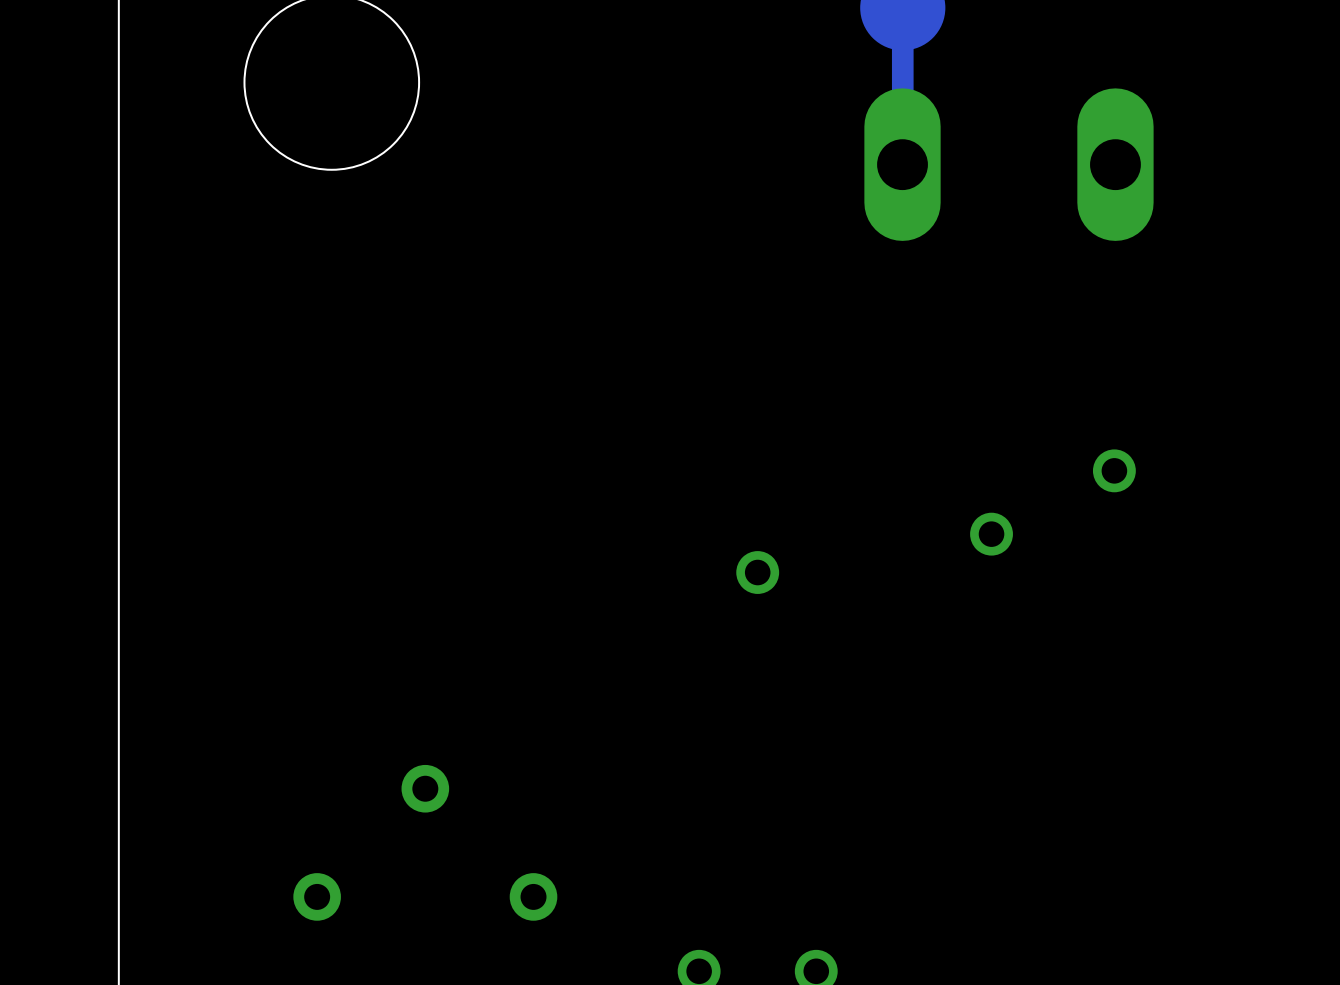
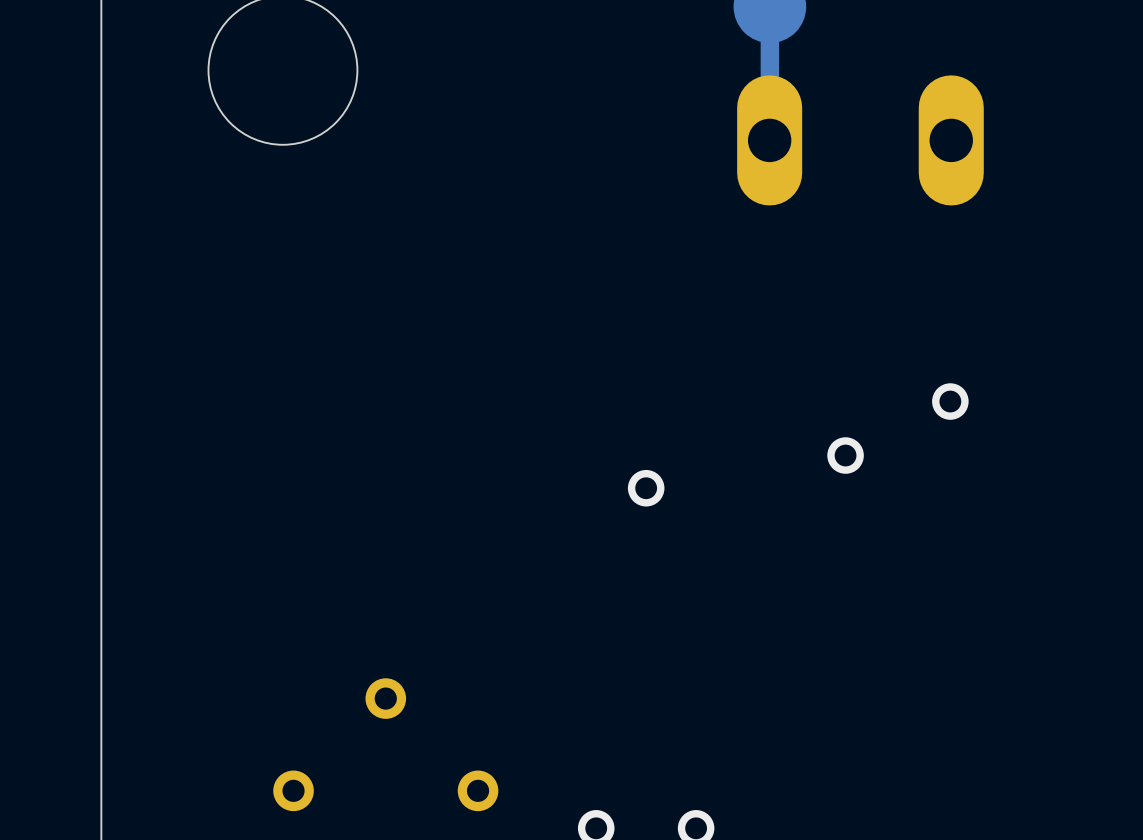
part position: (425, 842) -> (385, 744)

